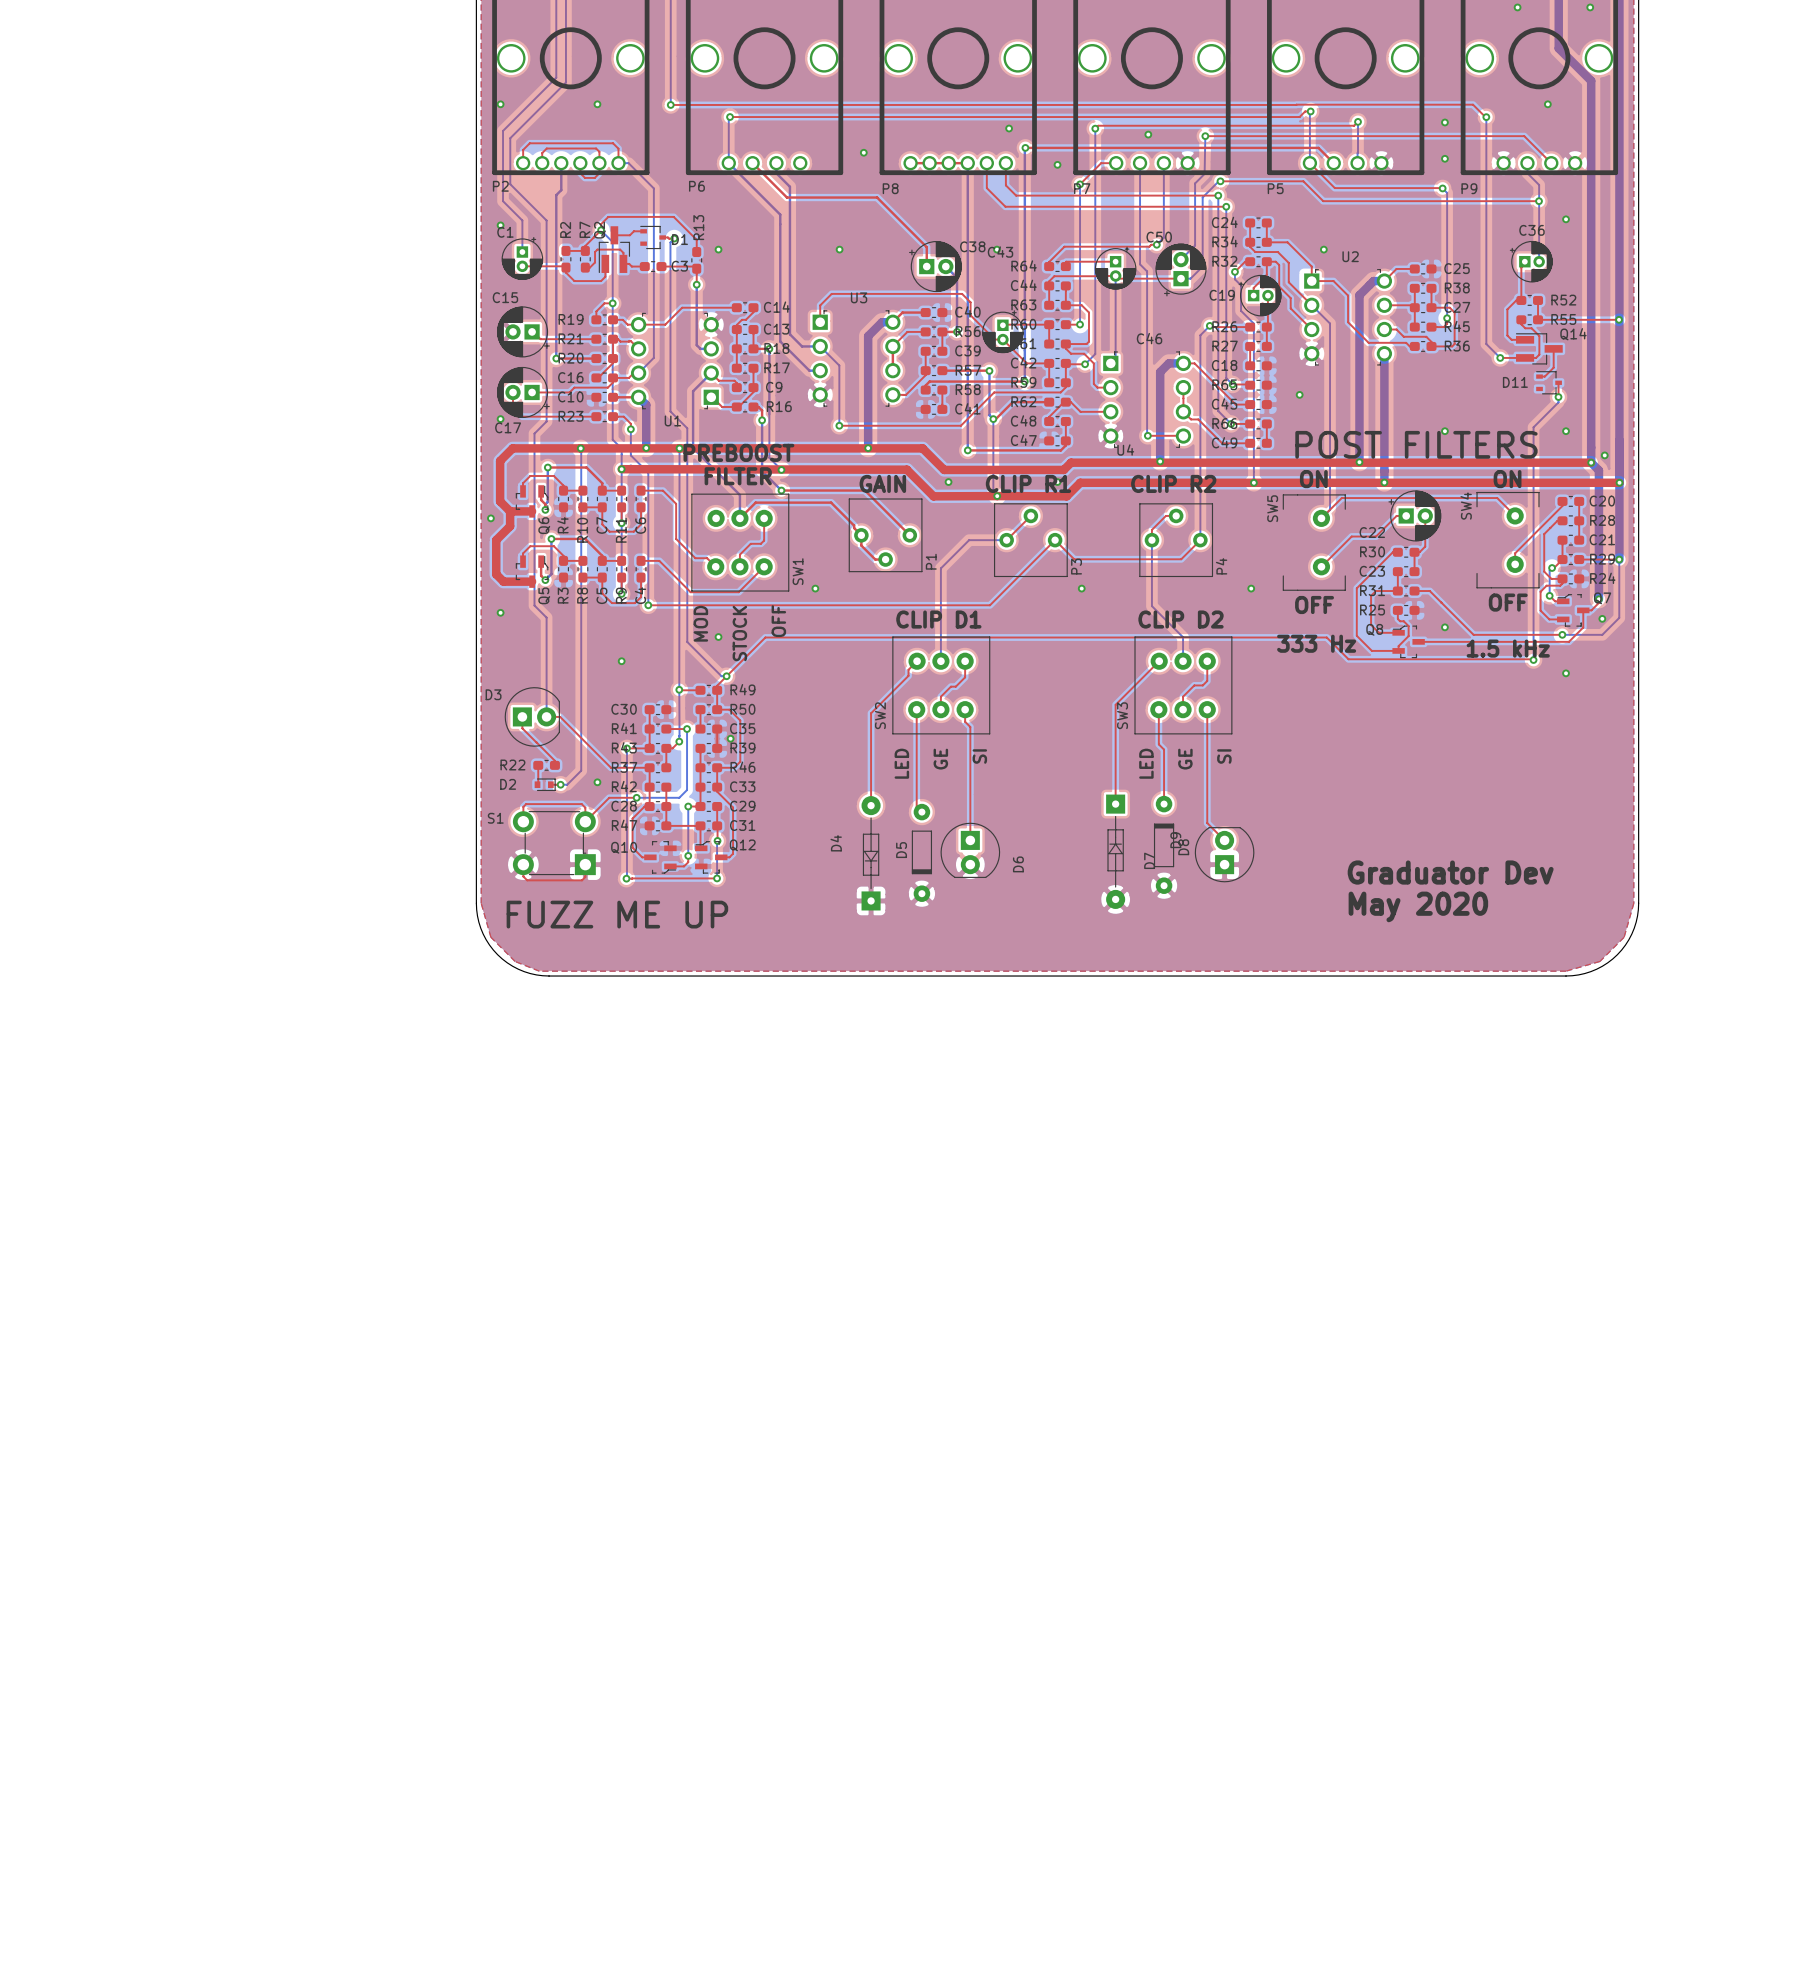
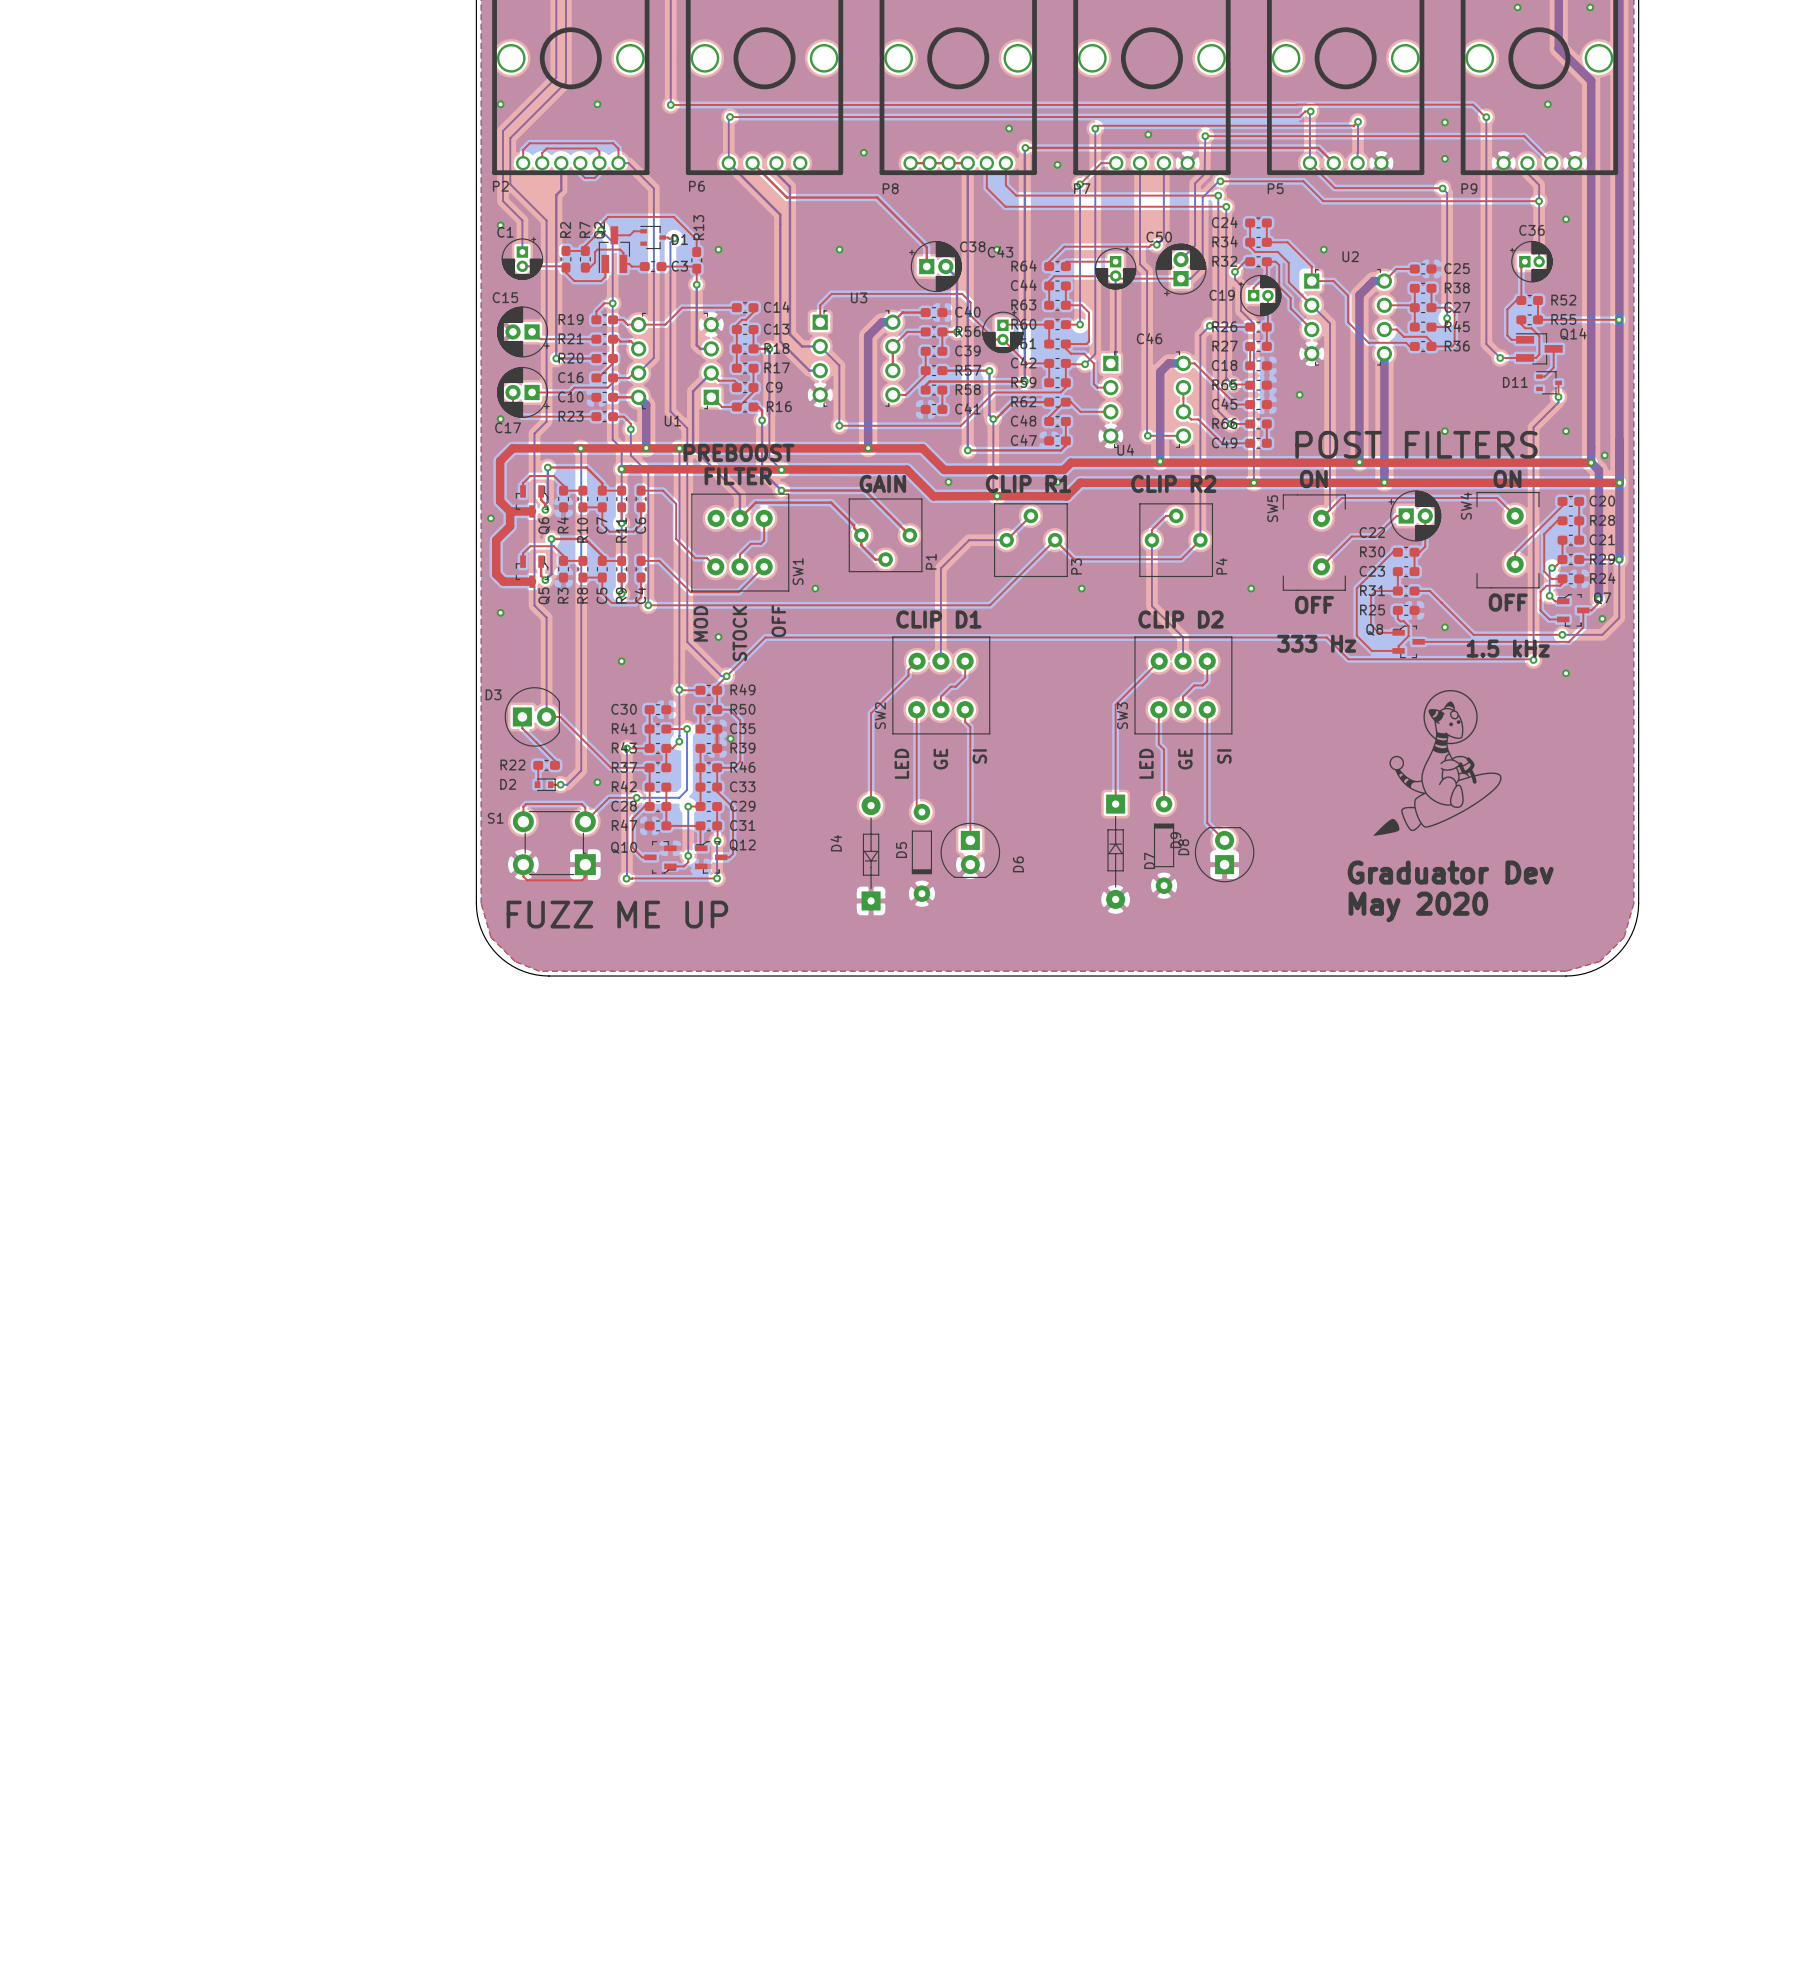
drawing: none -> [1373, 690, 1502, 836]

